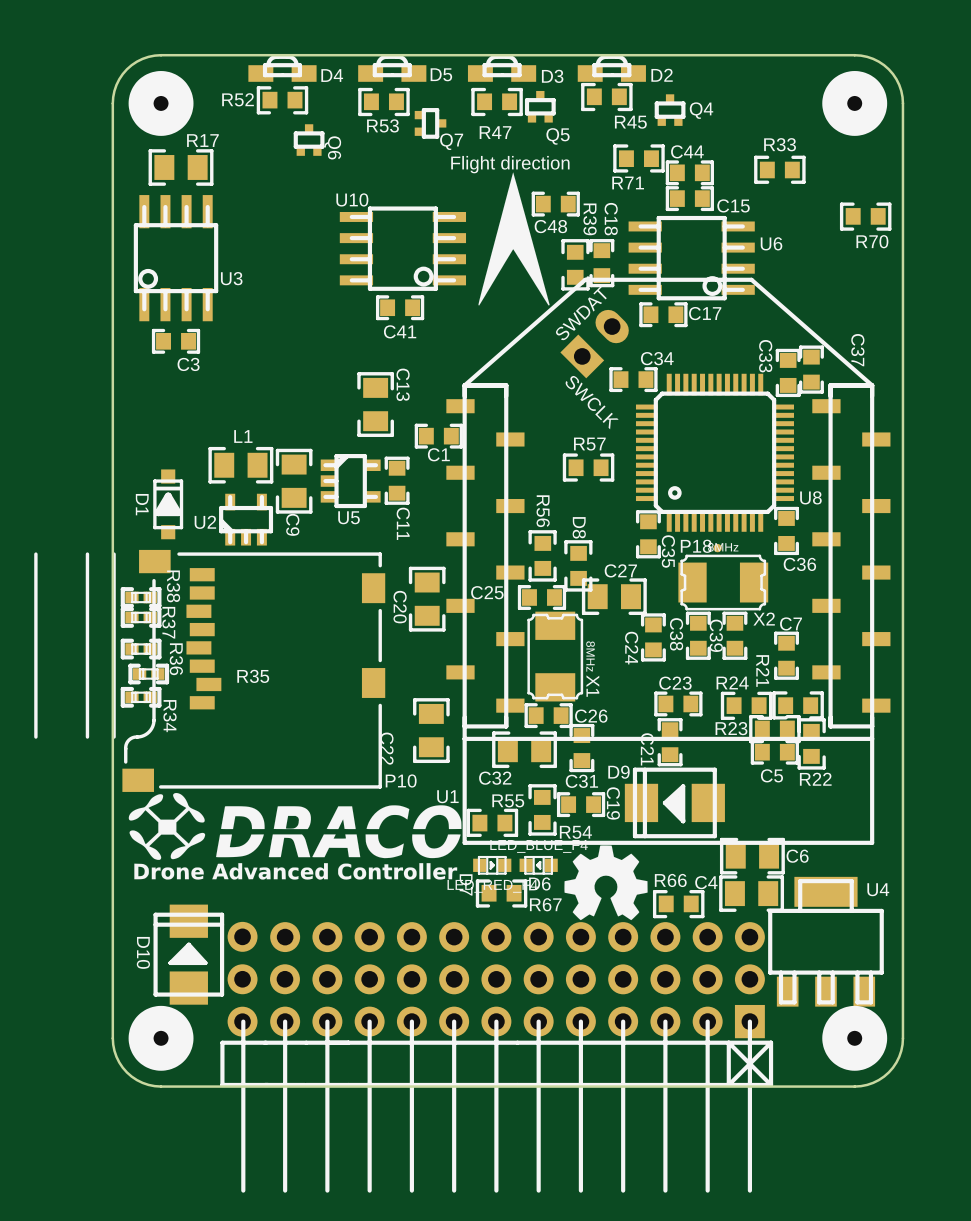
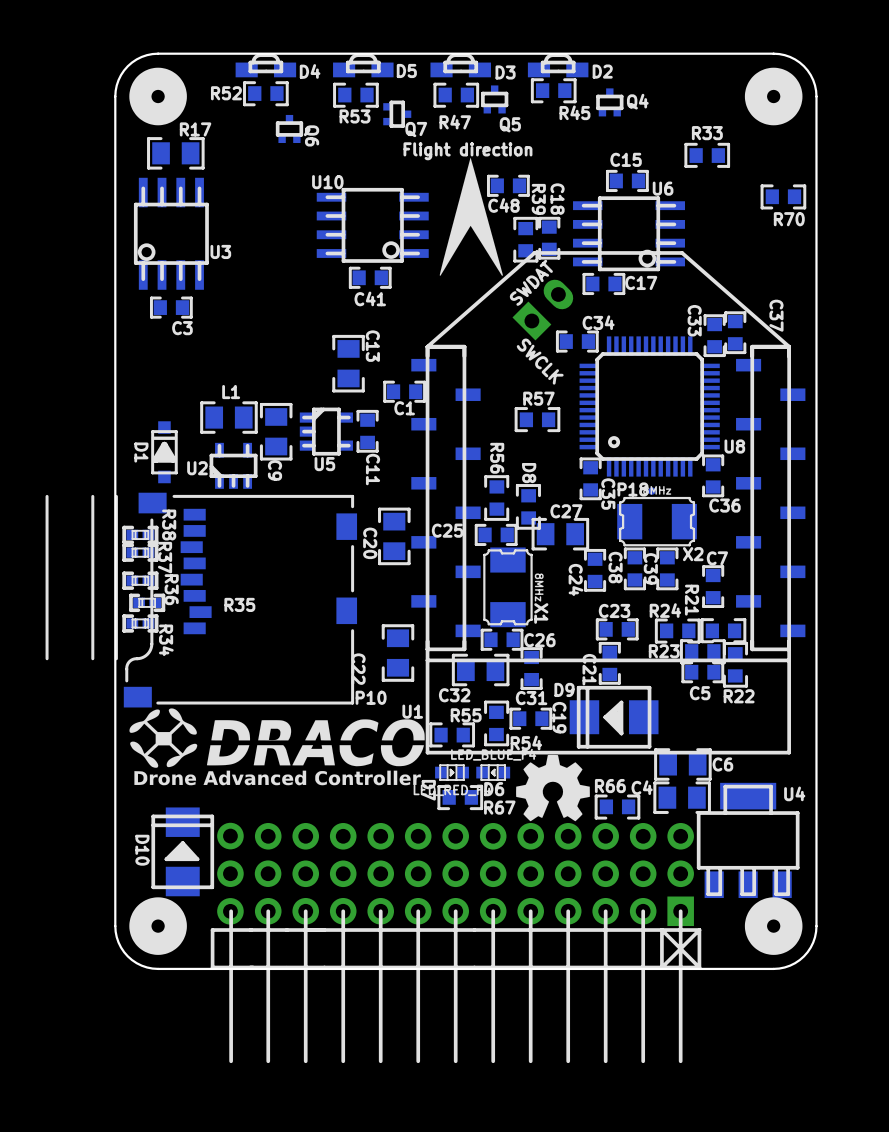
R71: (638, 158) -> none
C44: (689, 172) -> none
C15 name position: C15 (733, 205) -> C15 (626, 159)
U6 name position: U6 (771, 243) -> U6 (663, 188)

